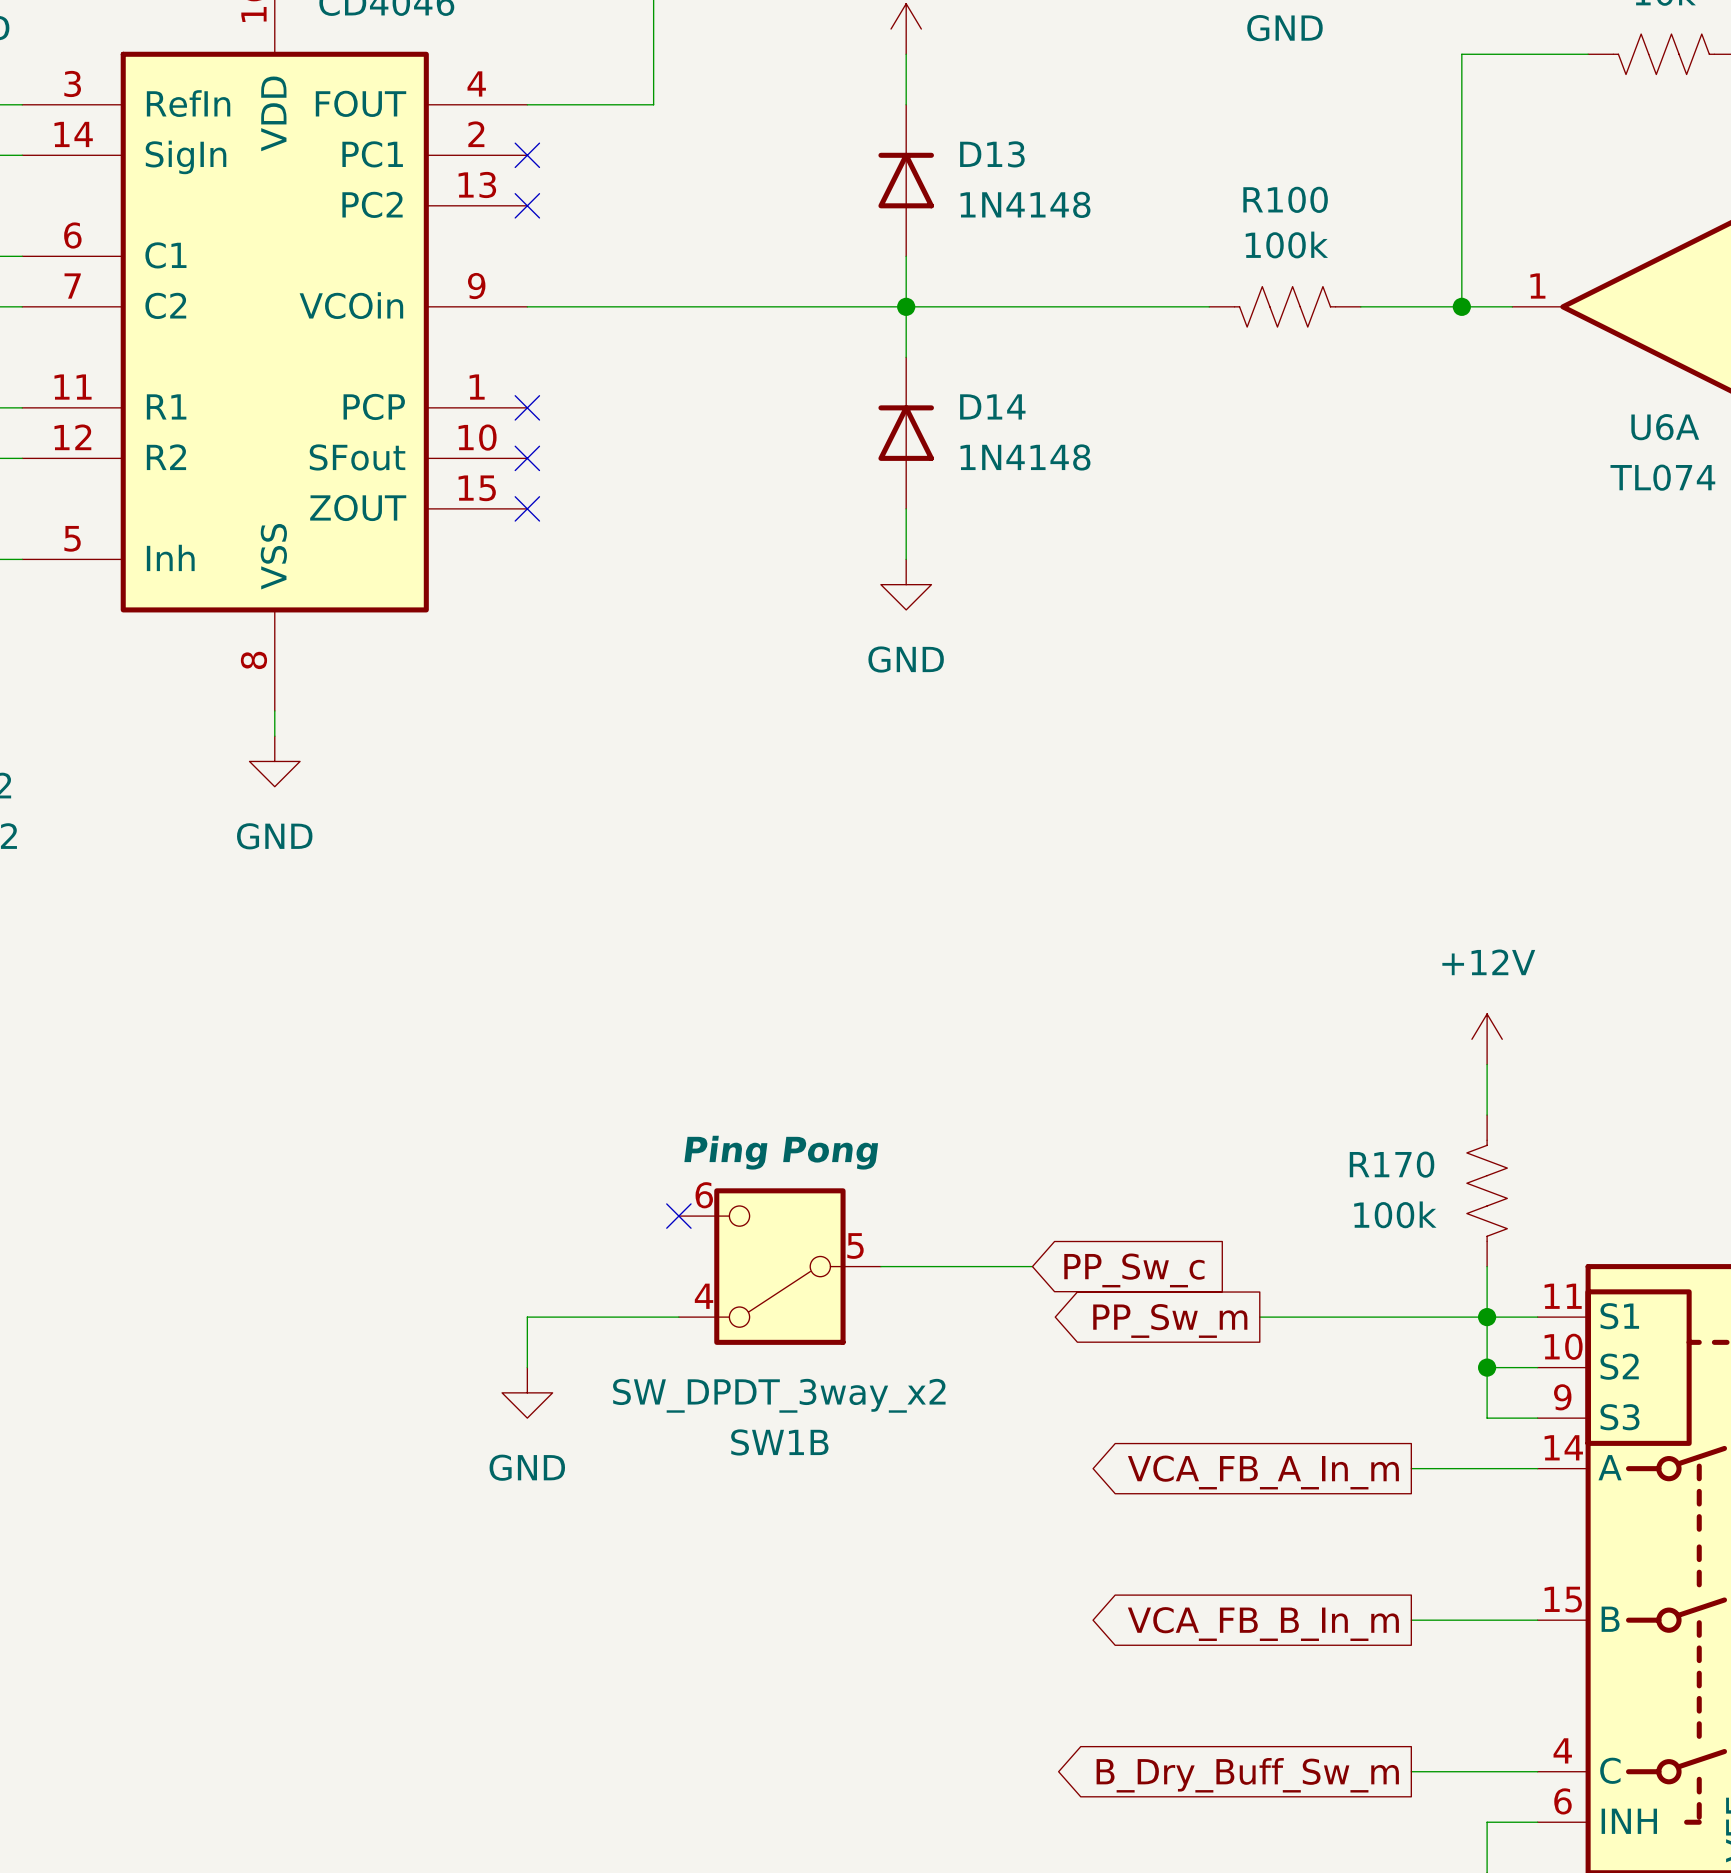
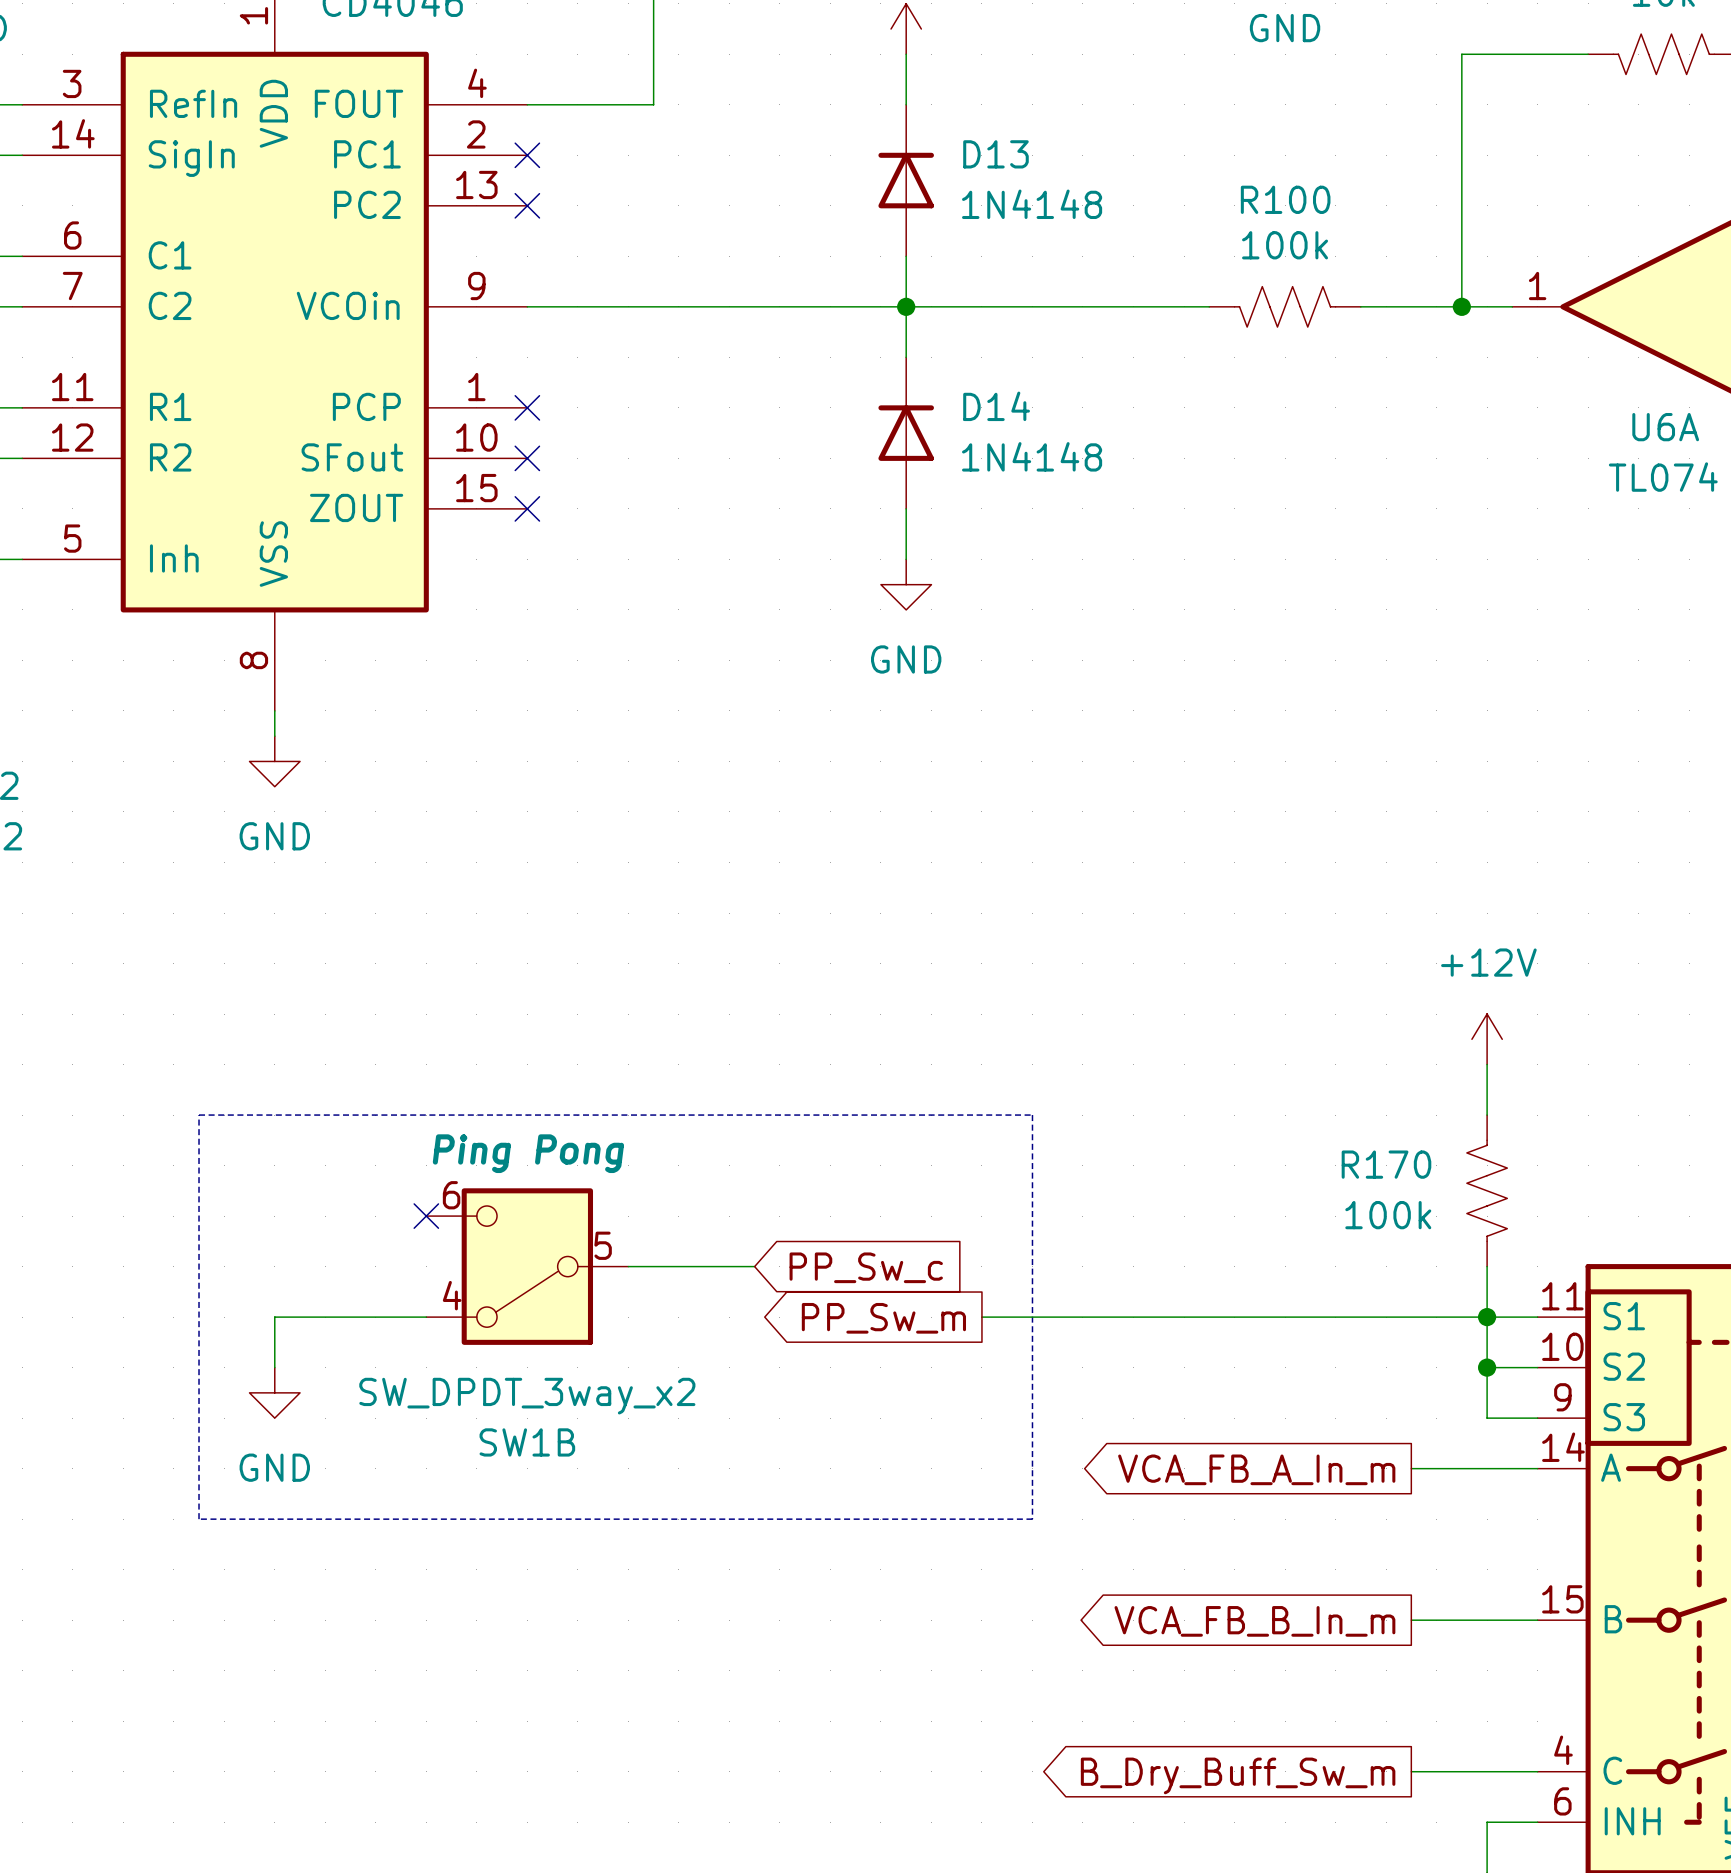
line: none -> (199, 1115) (1032, 1115) (1032, 1519) (199, 1519) (199, 1115)
no-connect mark: none -> (426, 1216)
no-connect mark: (678, 1216) -> none
wire: none -> (628, 1266) (754, 1266)
SW1B position: (779, 1266) -> (527, 1266)
wire: (880, 1266) (1032, 1266) -> none
global label position: PP_Sw_c (1134, 1270) -> PP_Sw_c (866, 1267)
wire: (678, 1317) (527, 1317) (527, 1367) -> (426, 1317) (274, 1317) (274, 1367)
wire: none -> (981, 1317) (1259, 1317)
global label position: PP_Sw_m (1170, 1320) -> PP_Sw_m (883, 1318)
power symbol position: GND (527, 1392) -> GND (274, 1392)

